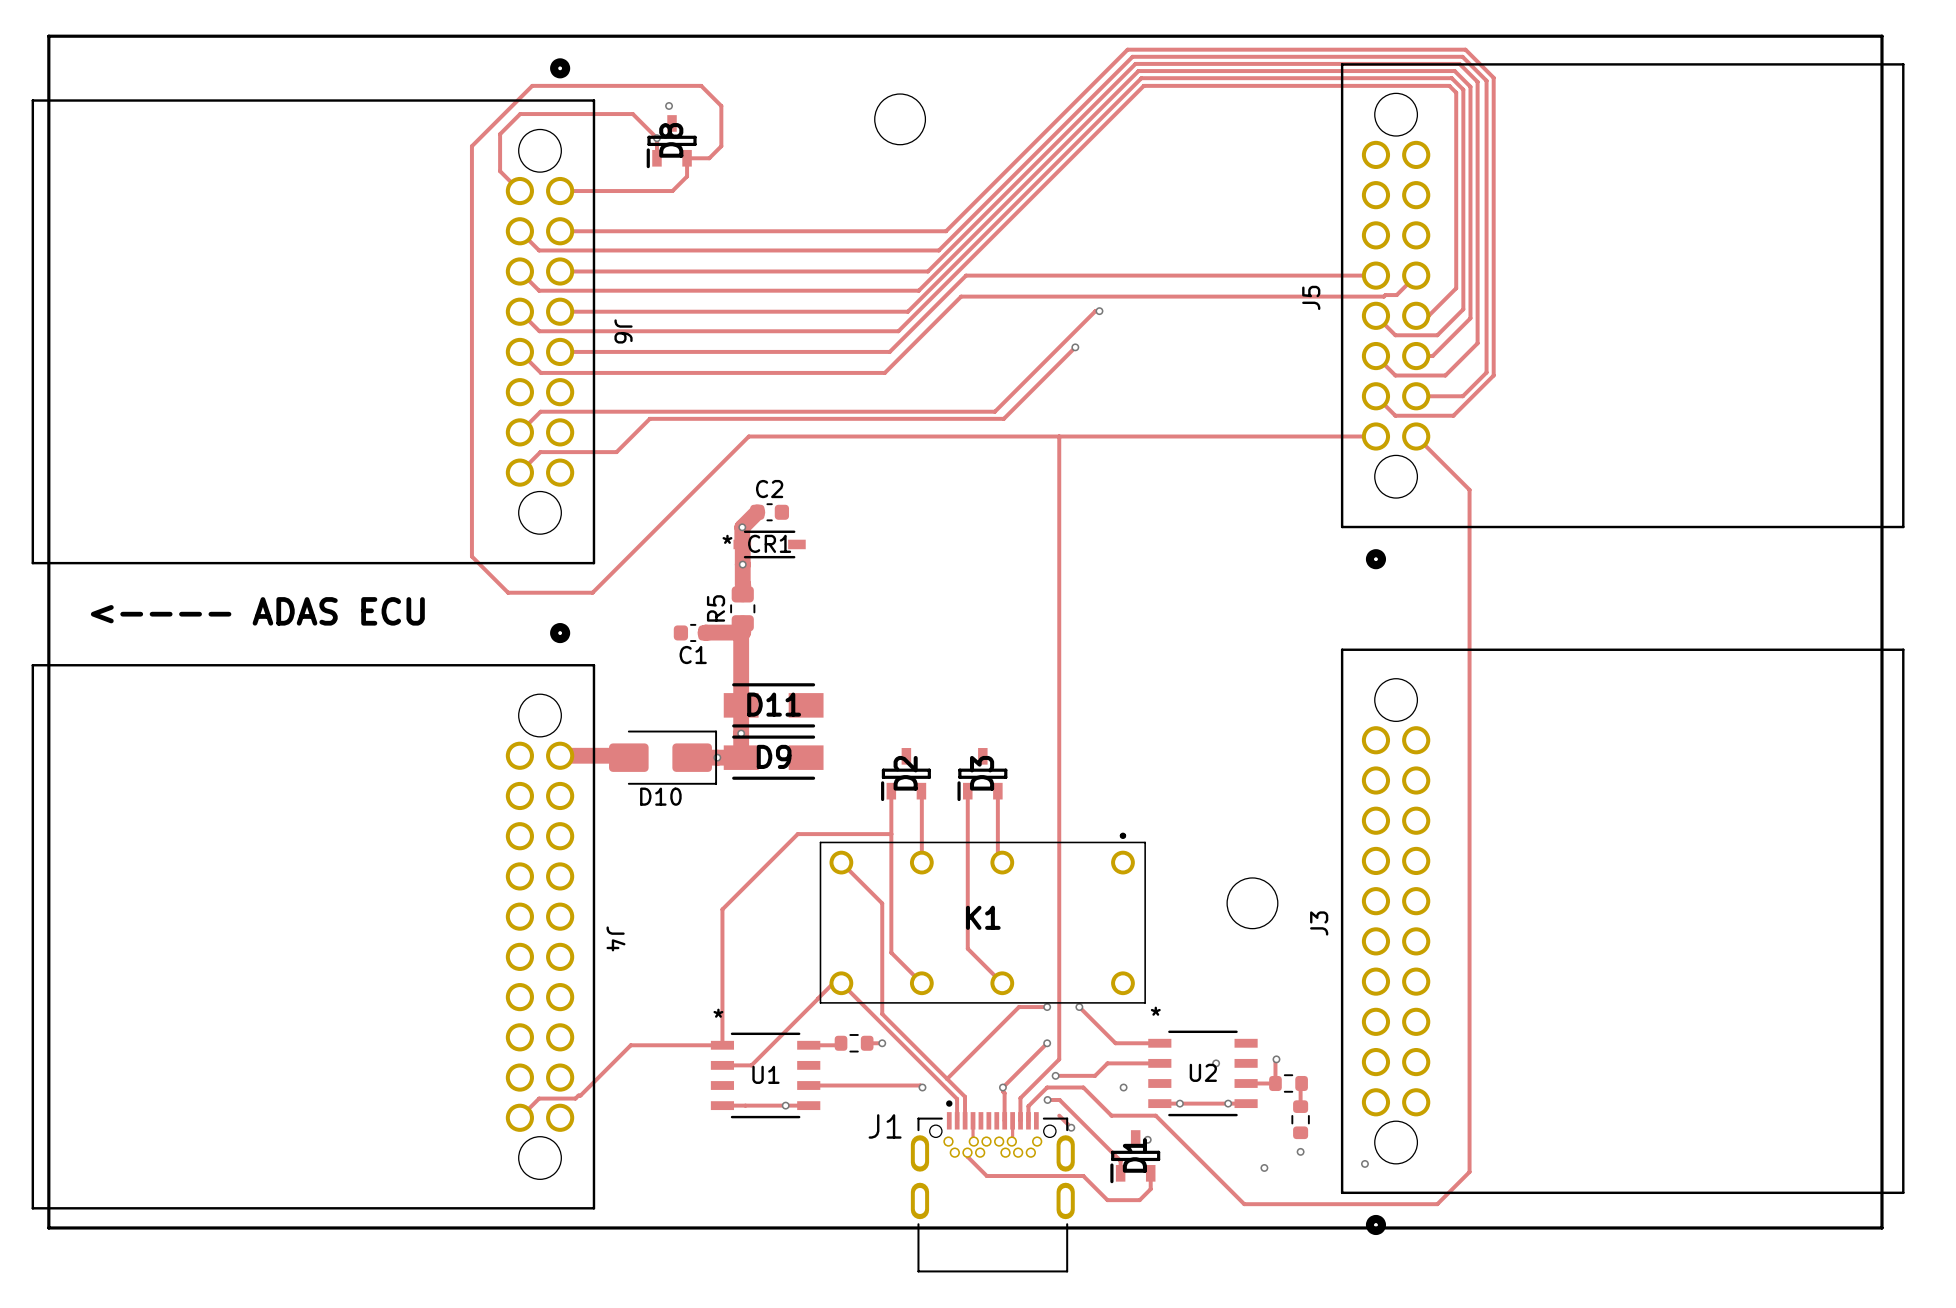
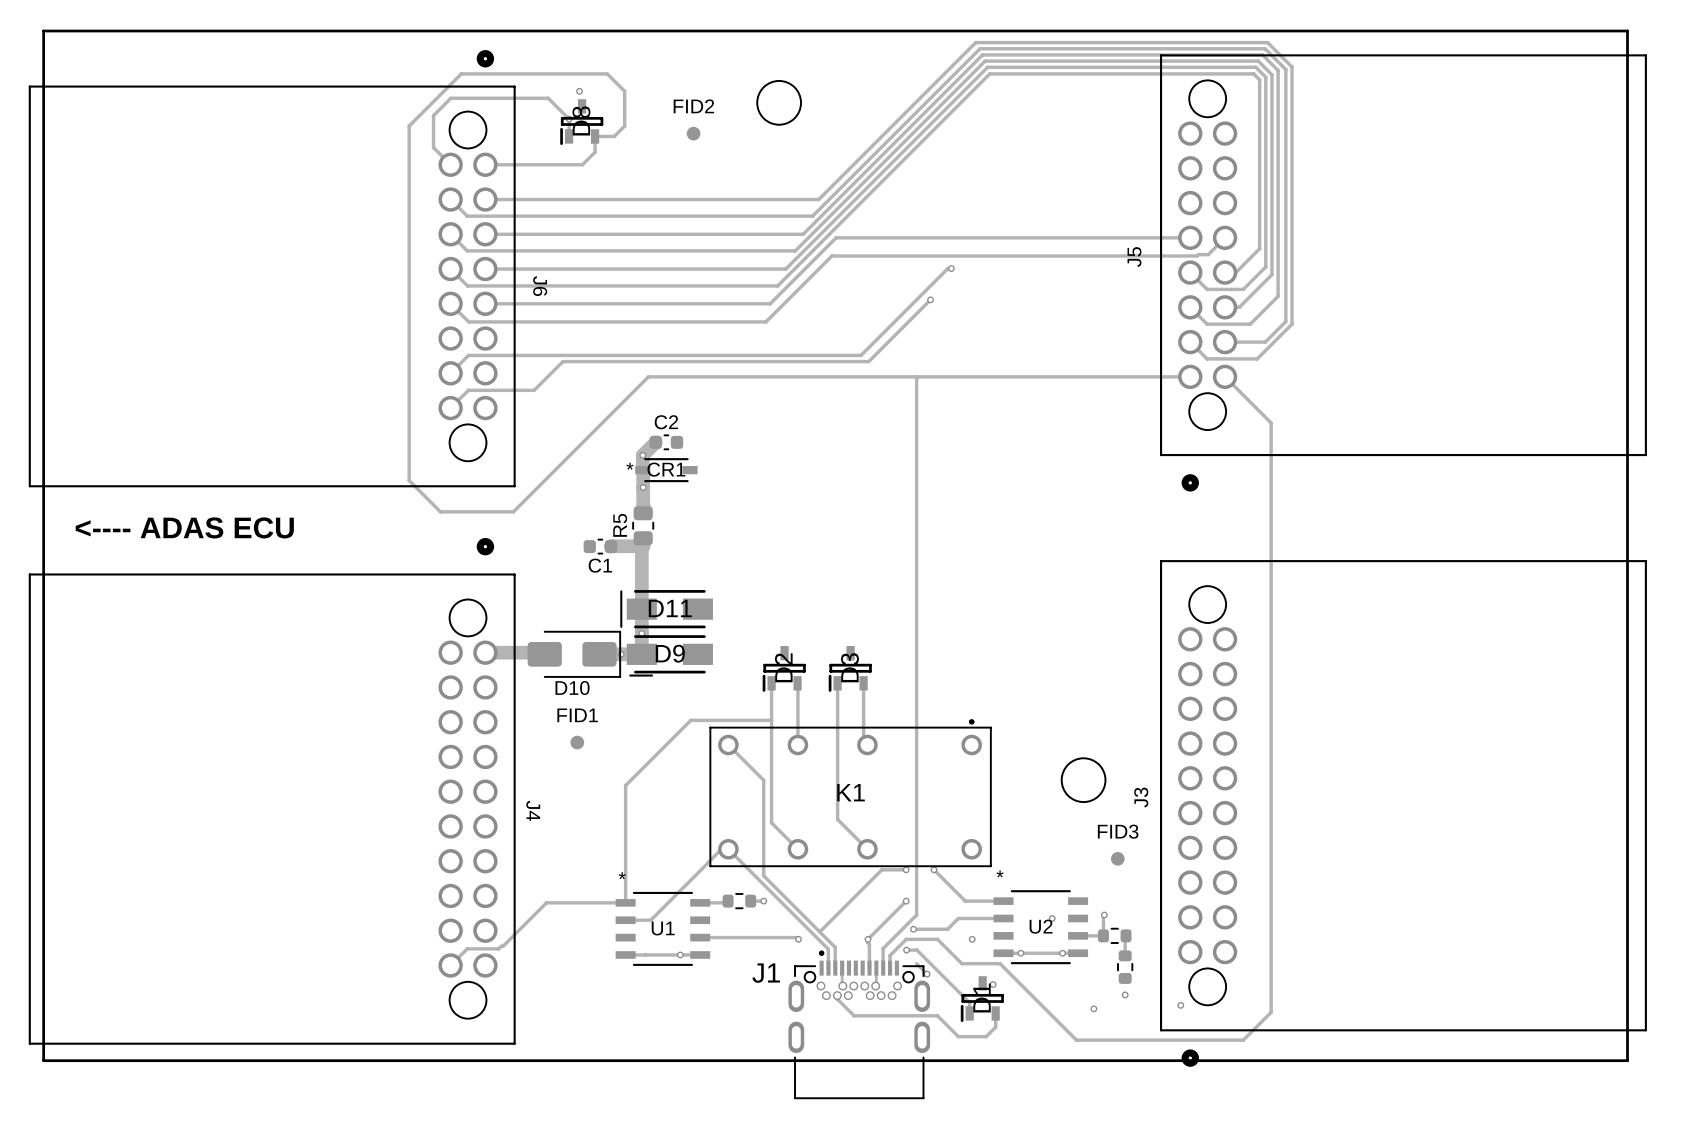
FID2: none -> (693, 133)
D11 footprint: [723, 683, 824, 728] -> [620, 590, 713, 629]
D9 footprint: [723, 735, 824, 780] -> [626, 635, 713, 677]
FID1: none -> (577, 742)
FID3: none -> (1117, 858)

